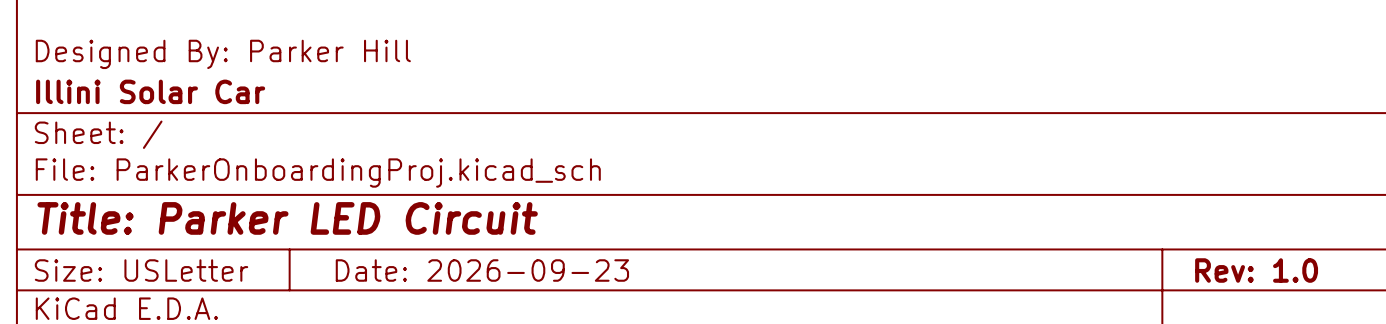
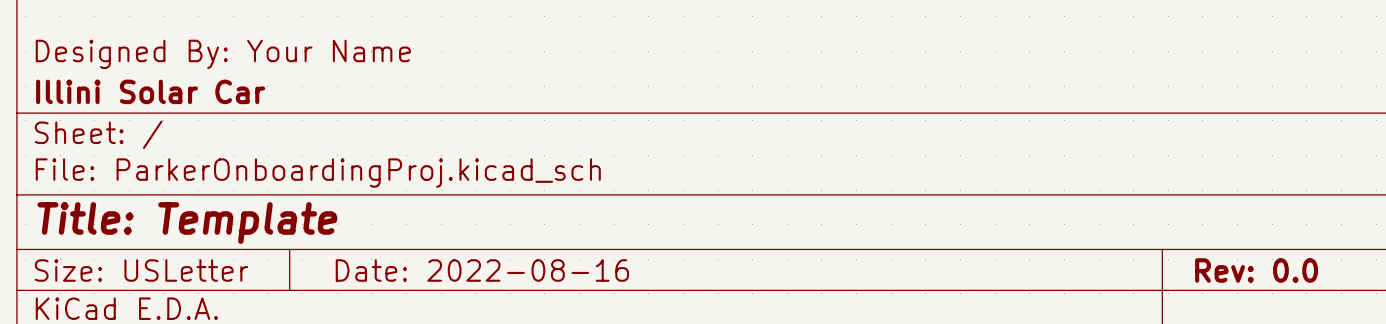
title block: Designed By: Parker Hill (223, 54) -> Designed By: Your Name (223, 54)
title block: Title: Parker LED Circuit (287, 218) -> Title: Template (187, 222)
title block: Date: 2026-09-23 (482, 270) -> Date: 2022-08-16 (482, 270)
title block: Rev: 1.0 (1256, 270) -> Rev: 0.0 (1256, 270)

